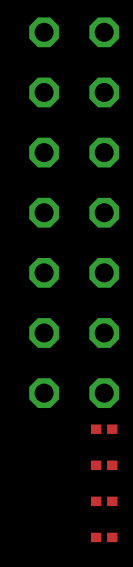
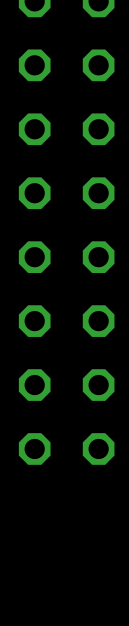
part: (104, 429) -> none
part: (104, 465) -> none
part: (104, 501) -> none
part: (104, 537) -> none

